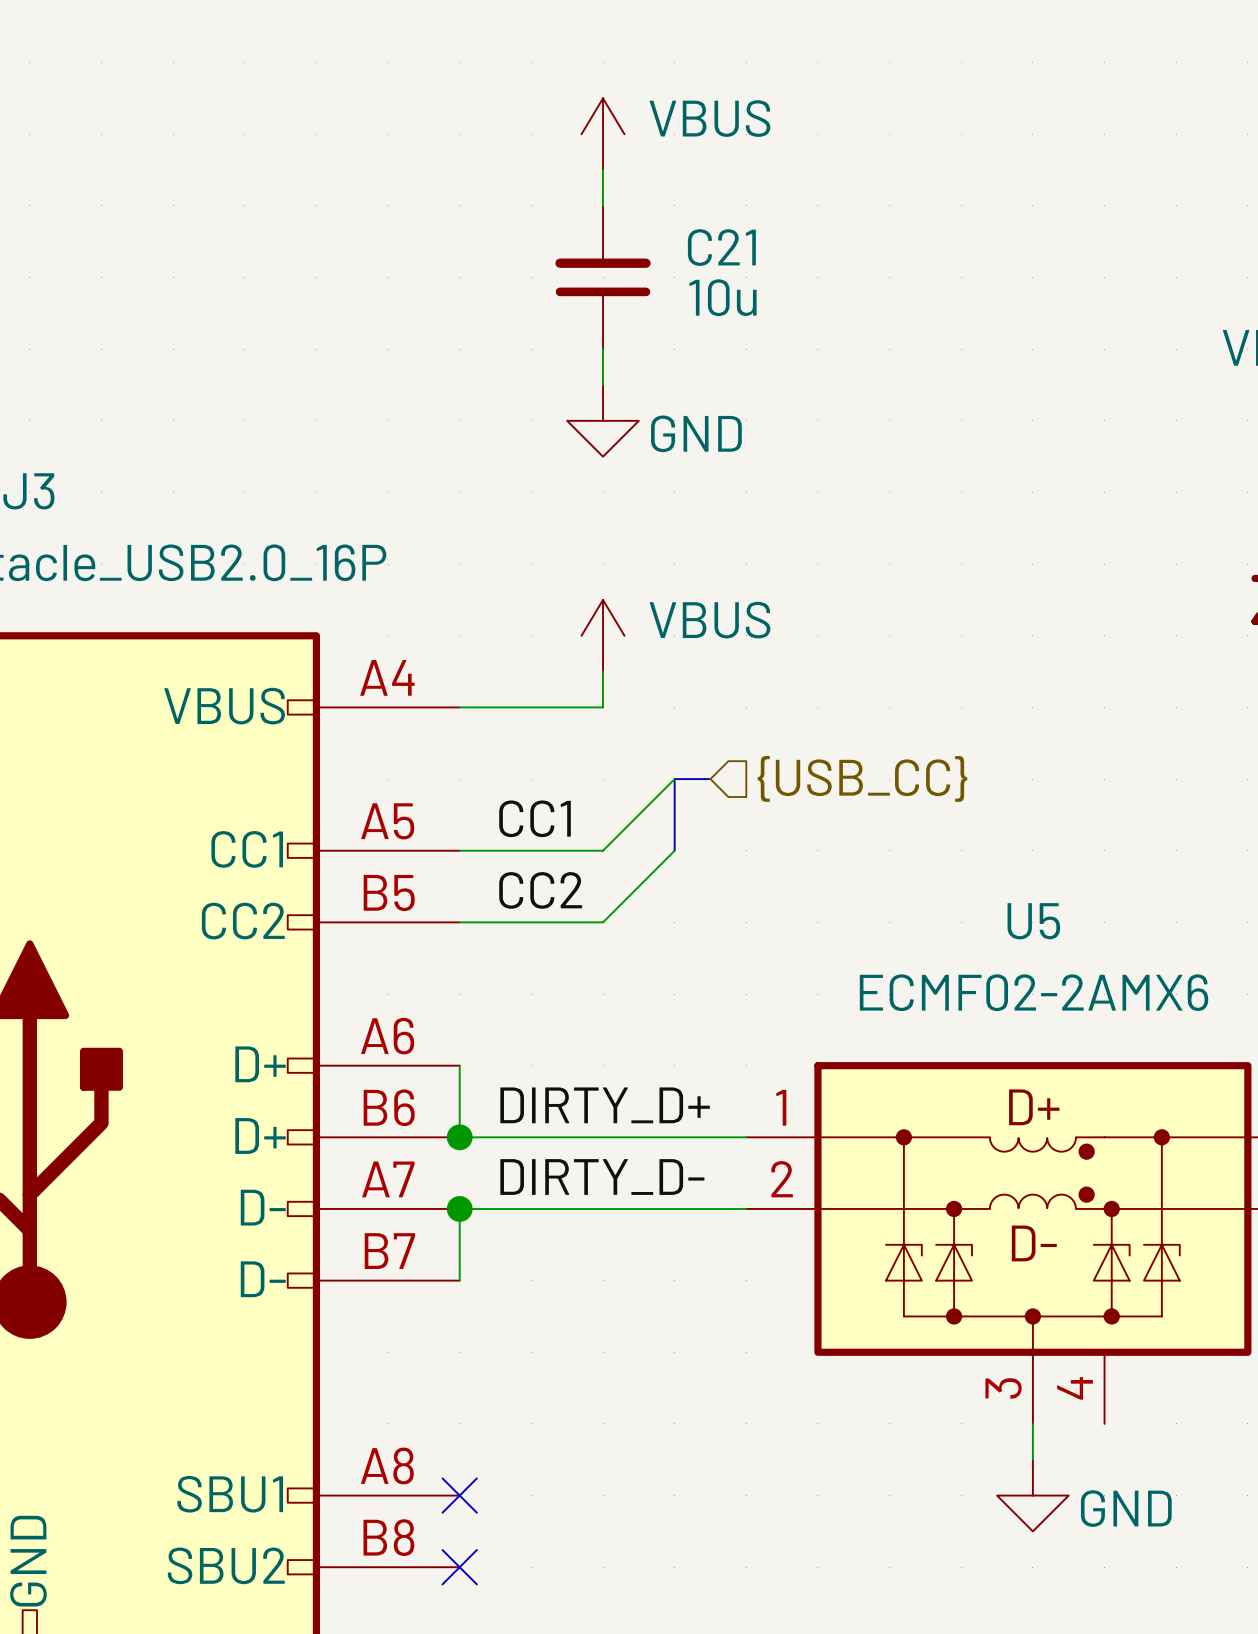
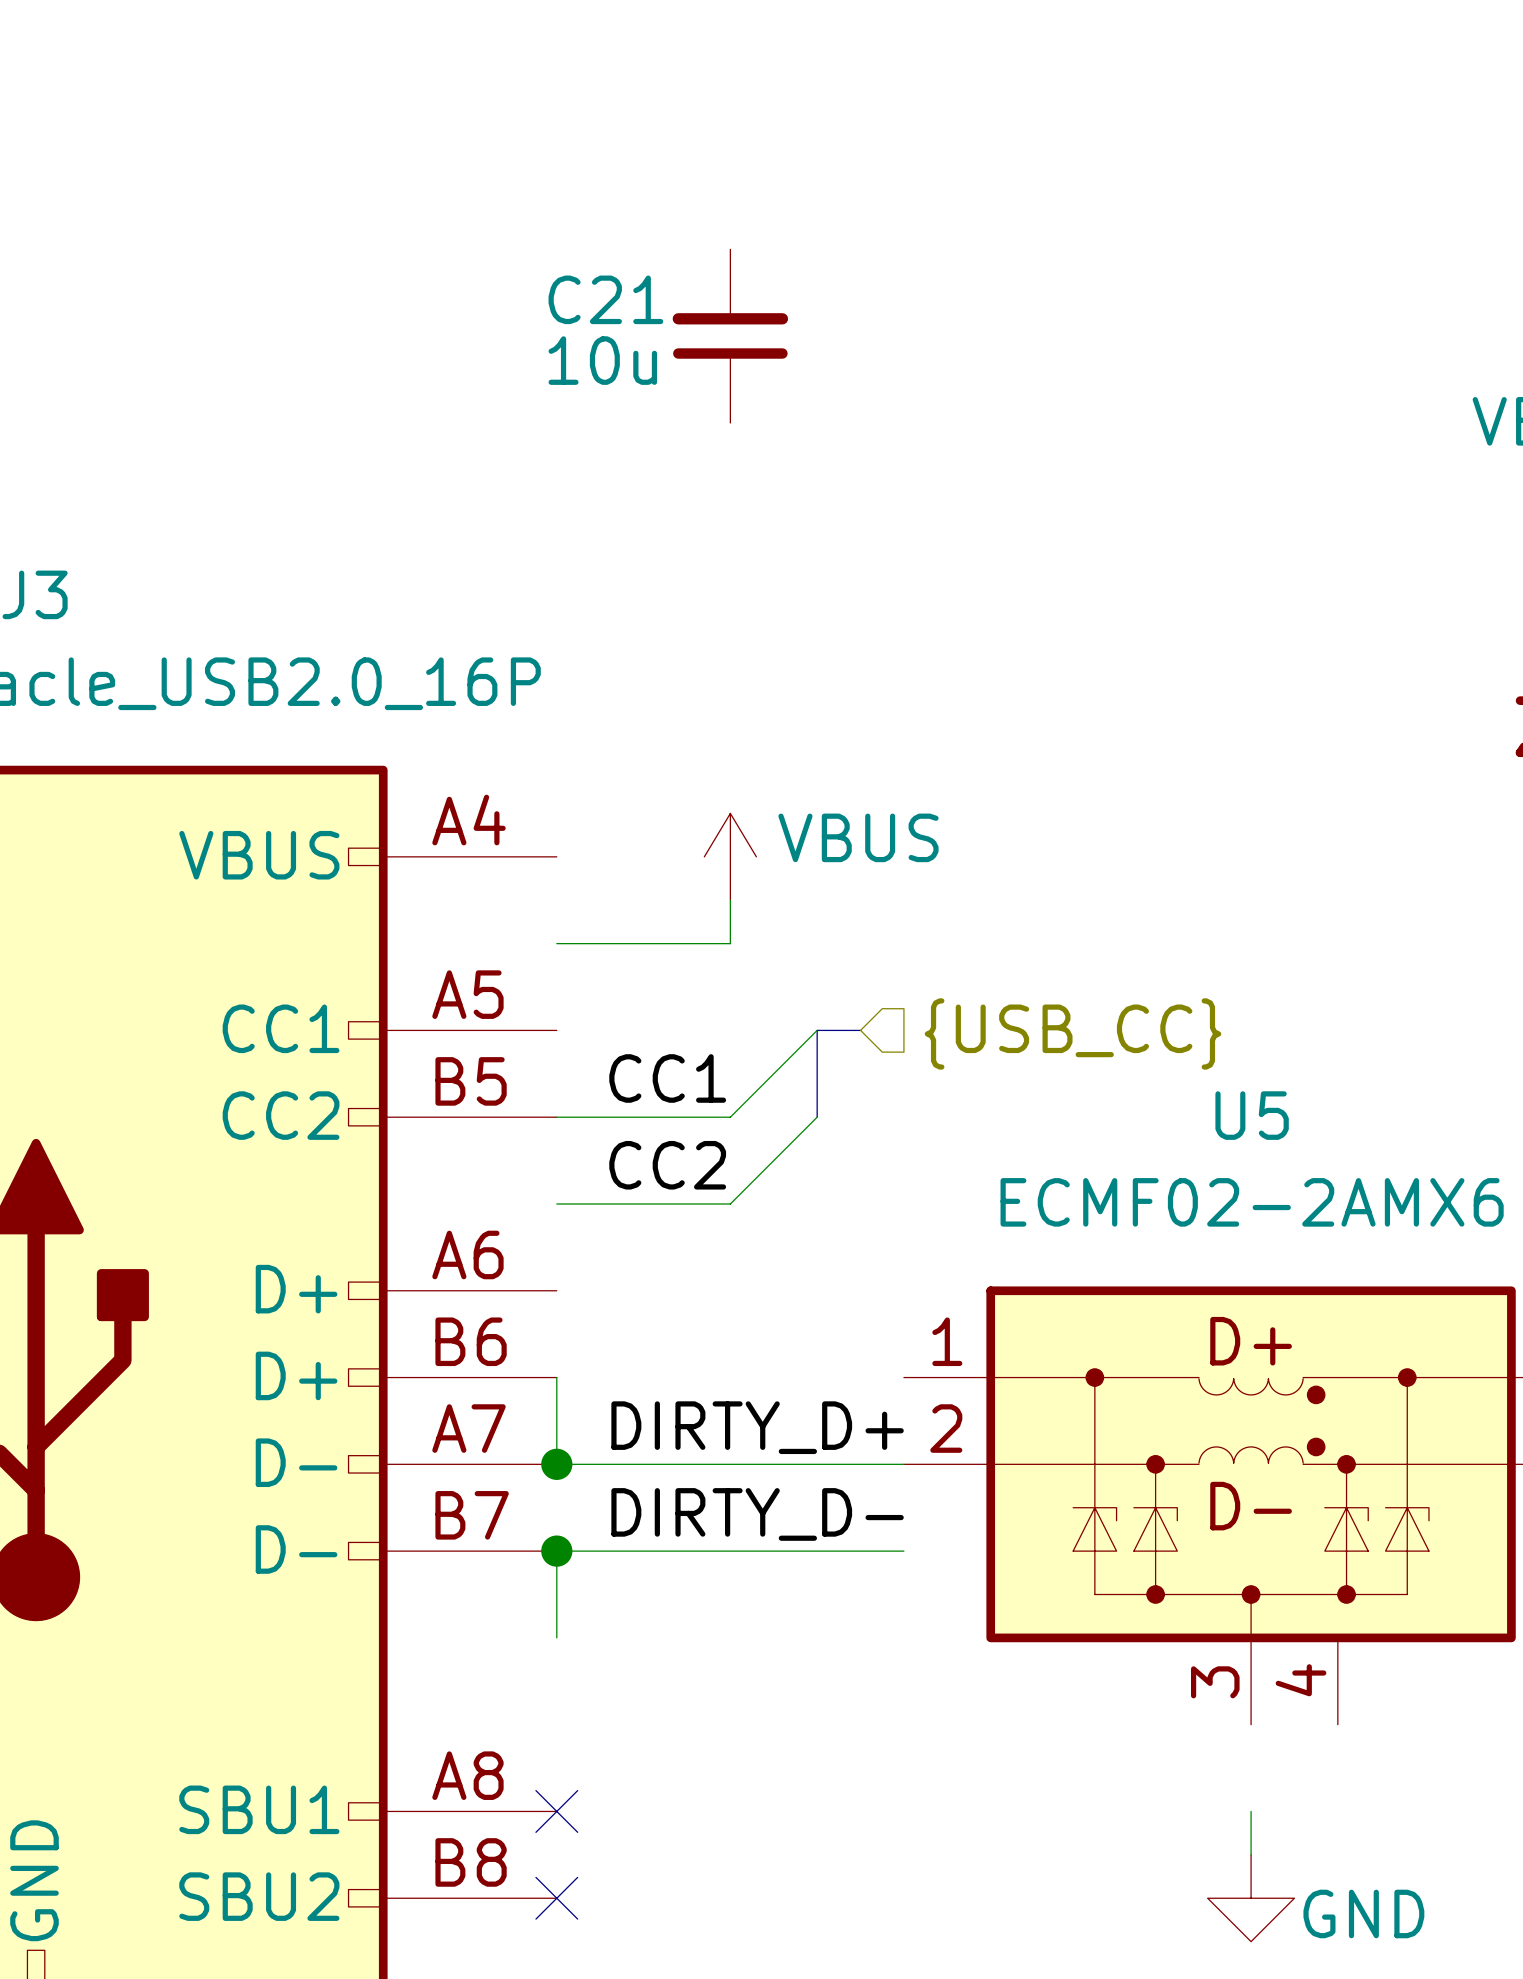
power symbol: VBUS (603, 134) -> none
wire: (603, 170) (603, 205) -> none
C21 name position: C21 (721, 247) -> C21 (605, 299)
C21 value position: 10u (722, 297) -> 10u (602, 360)
wire: (603, 349) (603, 385) -> none
power symbol: GND (603, 420) -> none
power symbol position: VBUS (603, 635) -> VBUS (730, 856)
wire: (603, 671) (603, 707) (459, 707) -> (730, 900) (730, 943) (556, 943)
hierarchical label position: {USB_CC} (862, 778) -> {USB_CC} (1073, 1033)
wire: (674, 779) (603, 850) (459, 850) -> (817, 1117) (730, 1203) (556, 1203)
bus: (710, 779) (674, 779) (674, 850) -> (860, 1030) (817, 1030) (817, 1117)
label: CC1 (535, 818) -> none
label: CC2 (540, 890) -> CC1 (667, 1078)
label: none -> CC2 (667, 1165)
wire: (459, 1065) (459, 1137) (746, 1137) -> none
label: DIRTY_D+ (605, 1105) -> none
junction position: (459, 1137) -> (556, 1551)
label: DIRTY_D- (602, 1177) -> DIRTY_D+ (757, 1427)
wire: (459, 1208) (459, 1280) -> (556, 1464) (556, 1377)
label: none -> DIRTY_D- (757, 1514)
wire: none -> (903, 1551) (556, 1551) (556, 1637)
wire: (1032, 1423) (1032, 1459) -> (1251, 1811) (1251, 1854)
power symbol position: GND (1032, 1495) -> GND (1251, 1898)

